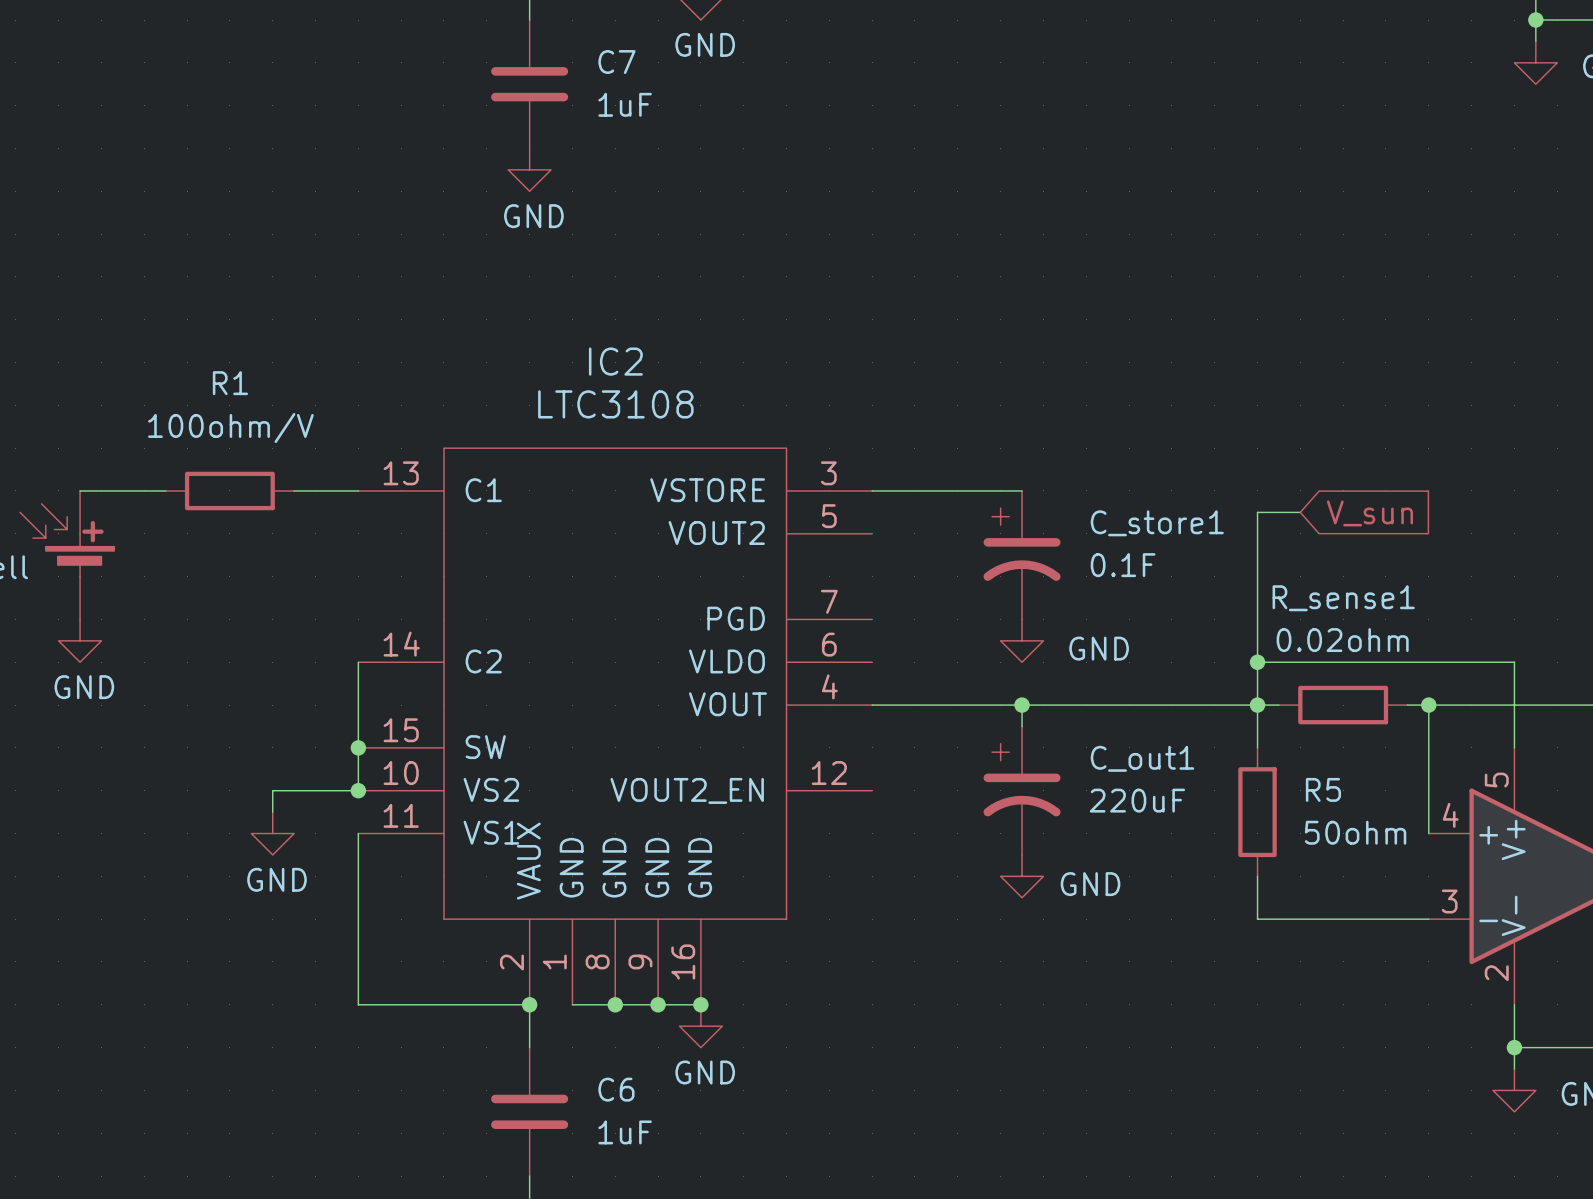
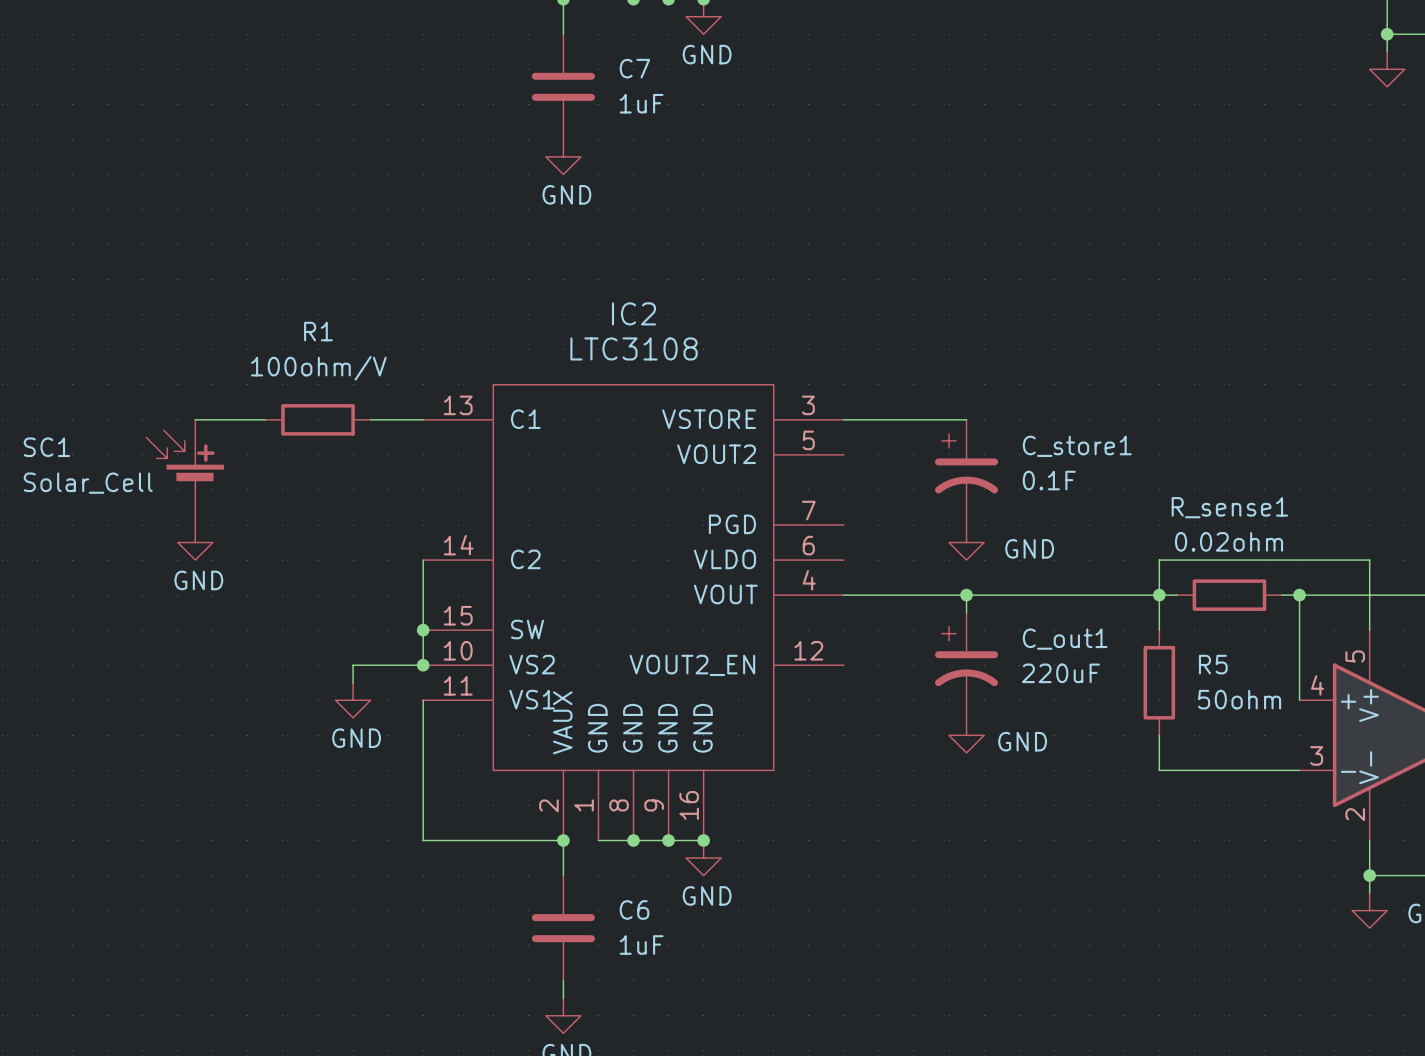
wire: (1300, 512) (1257, 512) (1257, 662) -> none
global label: V_sun (1369, 513) -> none
junction: (1257, 662) -> none

